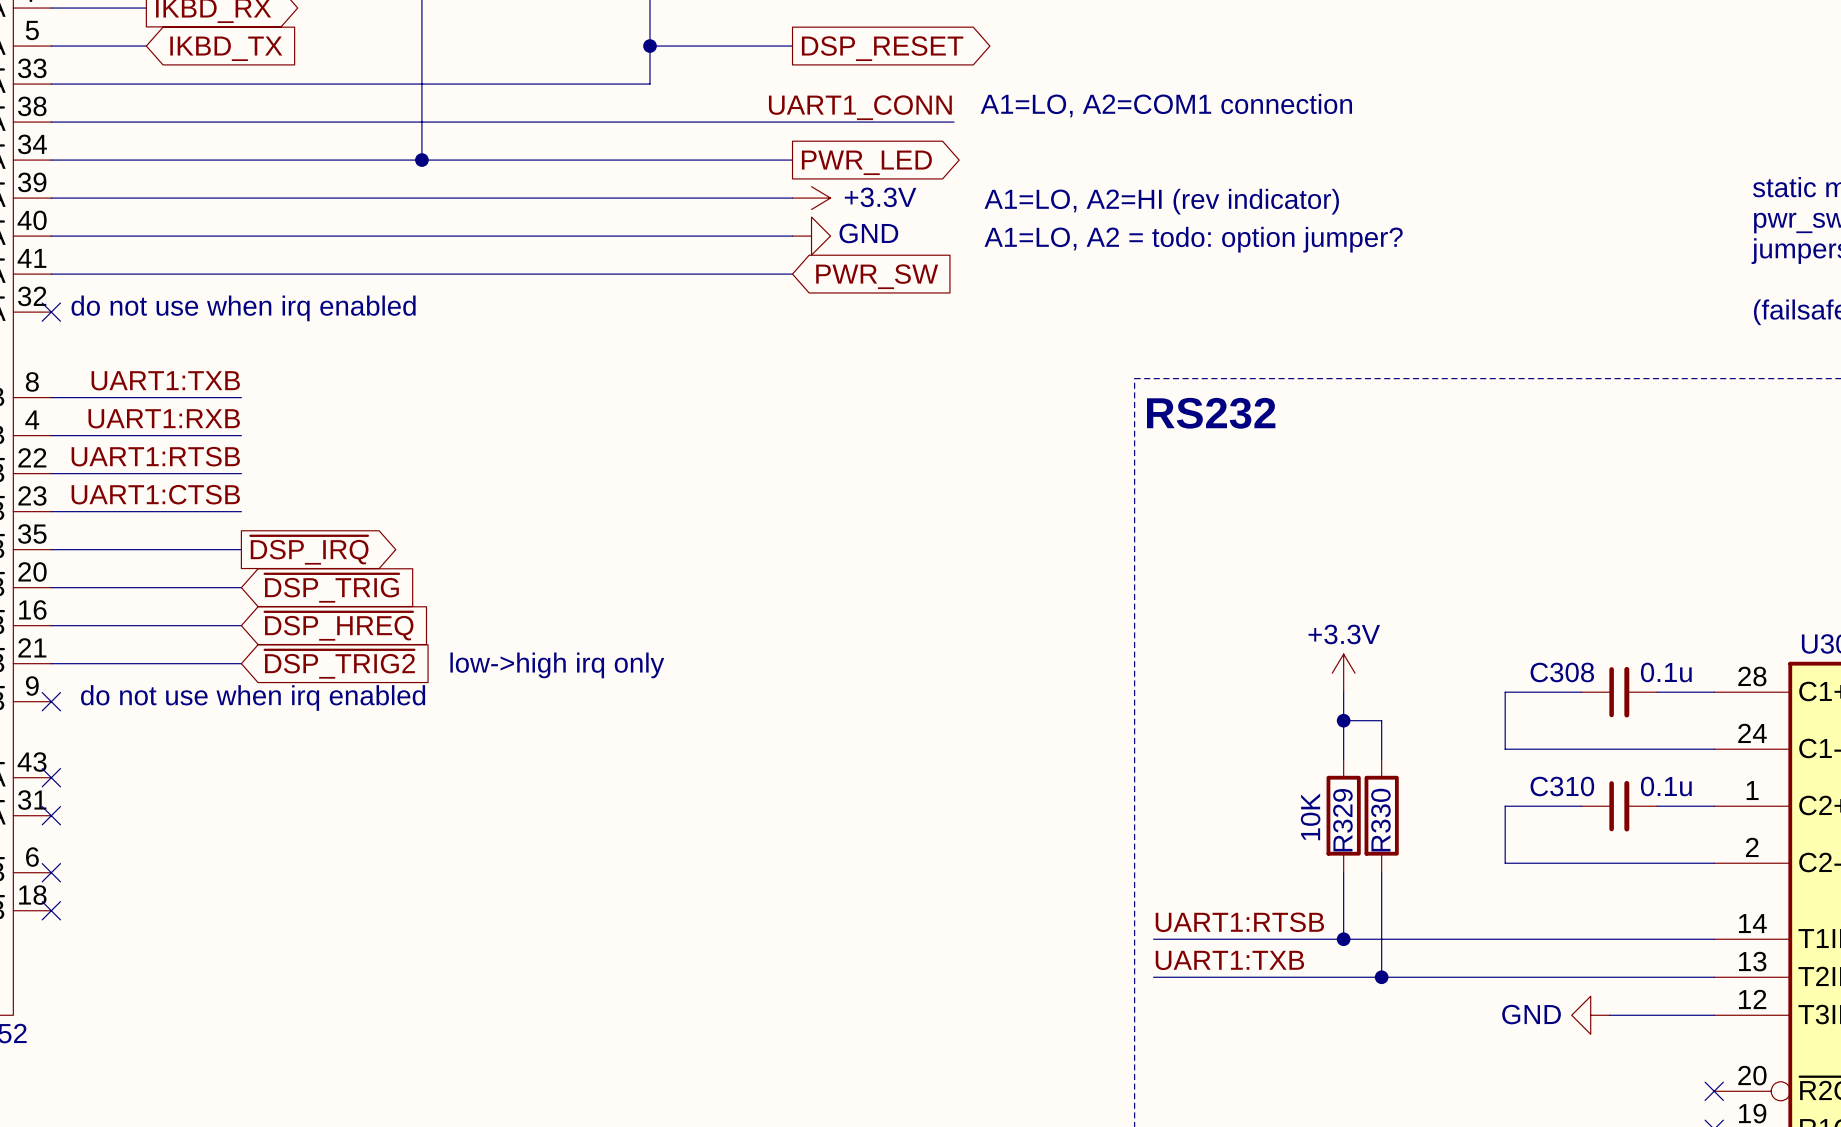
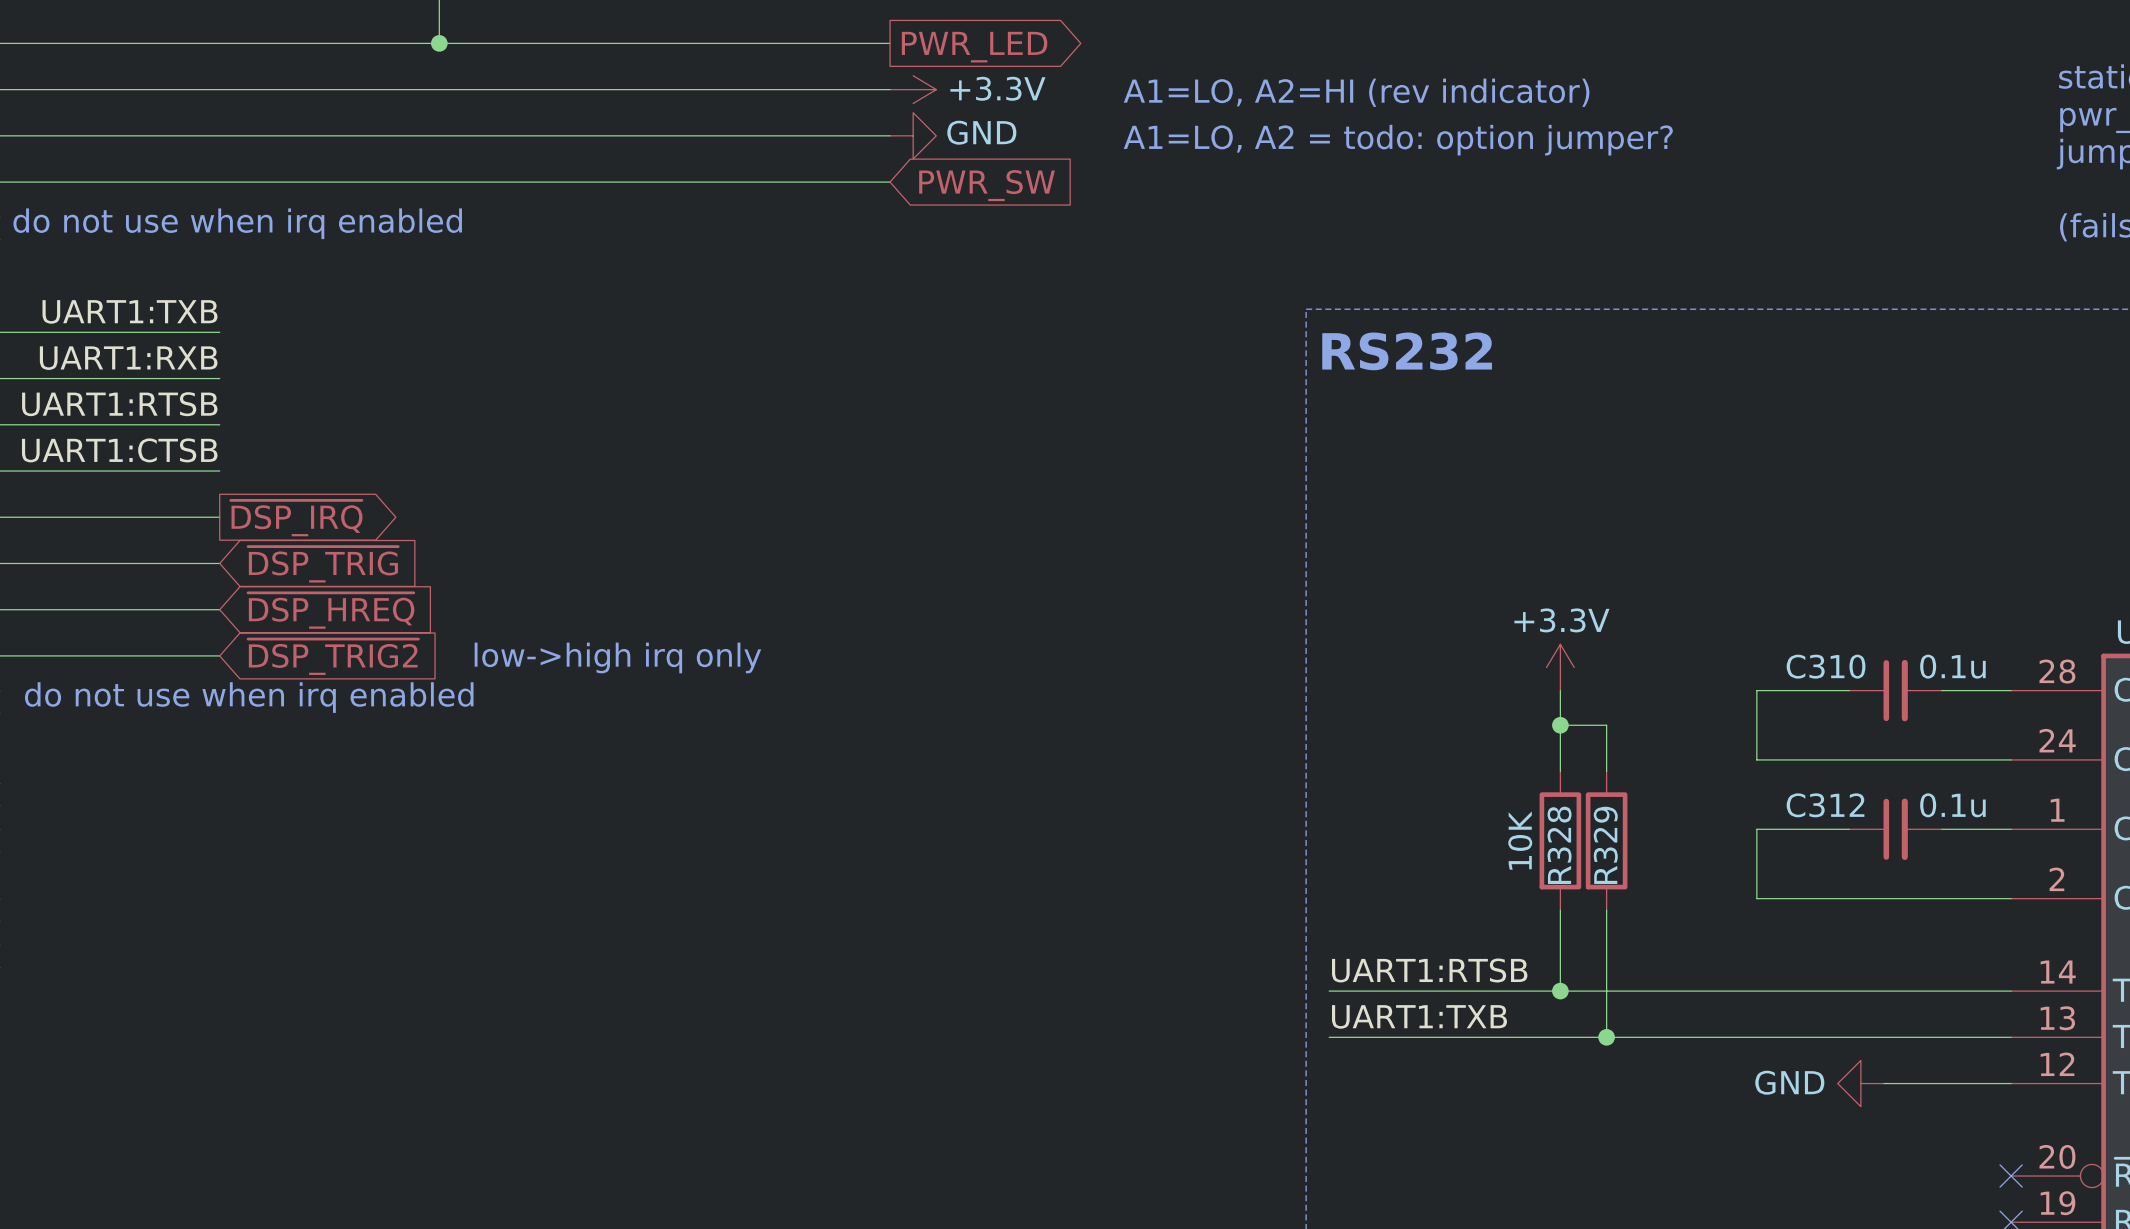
C308 name: C308 (1562, 672) -> C310 (1826, 666)
C310 name: C310 (1562, 786) -> C312 (1825, 805)
R329 name: R329 (1342, 820) -> R328 (1559, 845)
R330 name: R330 (1380, 820) -> R329 (1605, 845)

